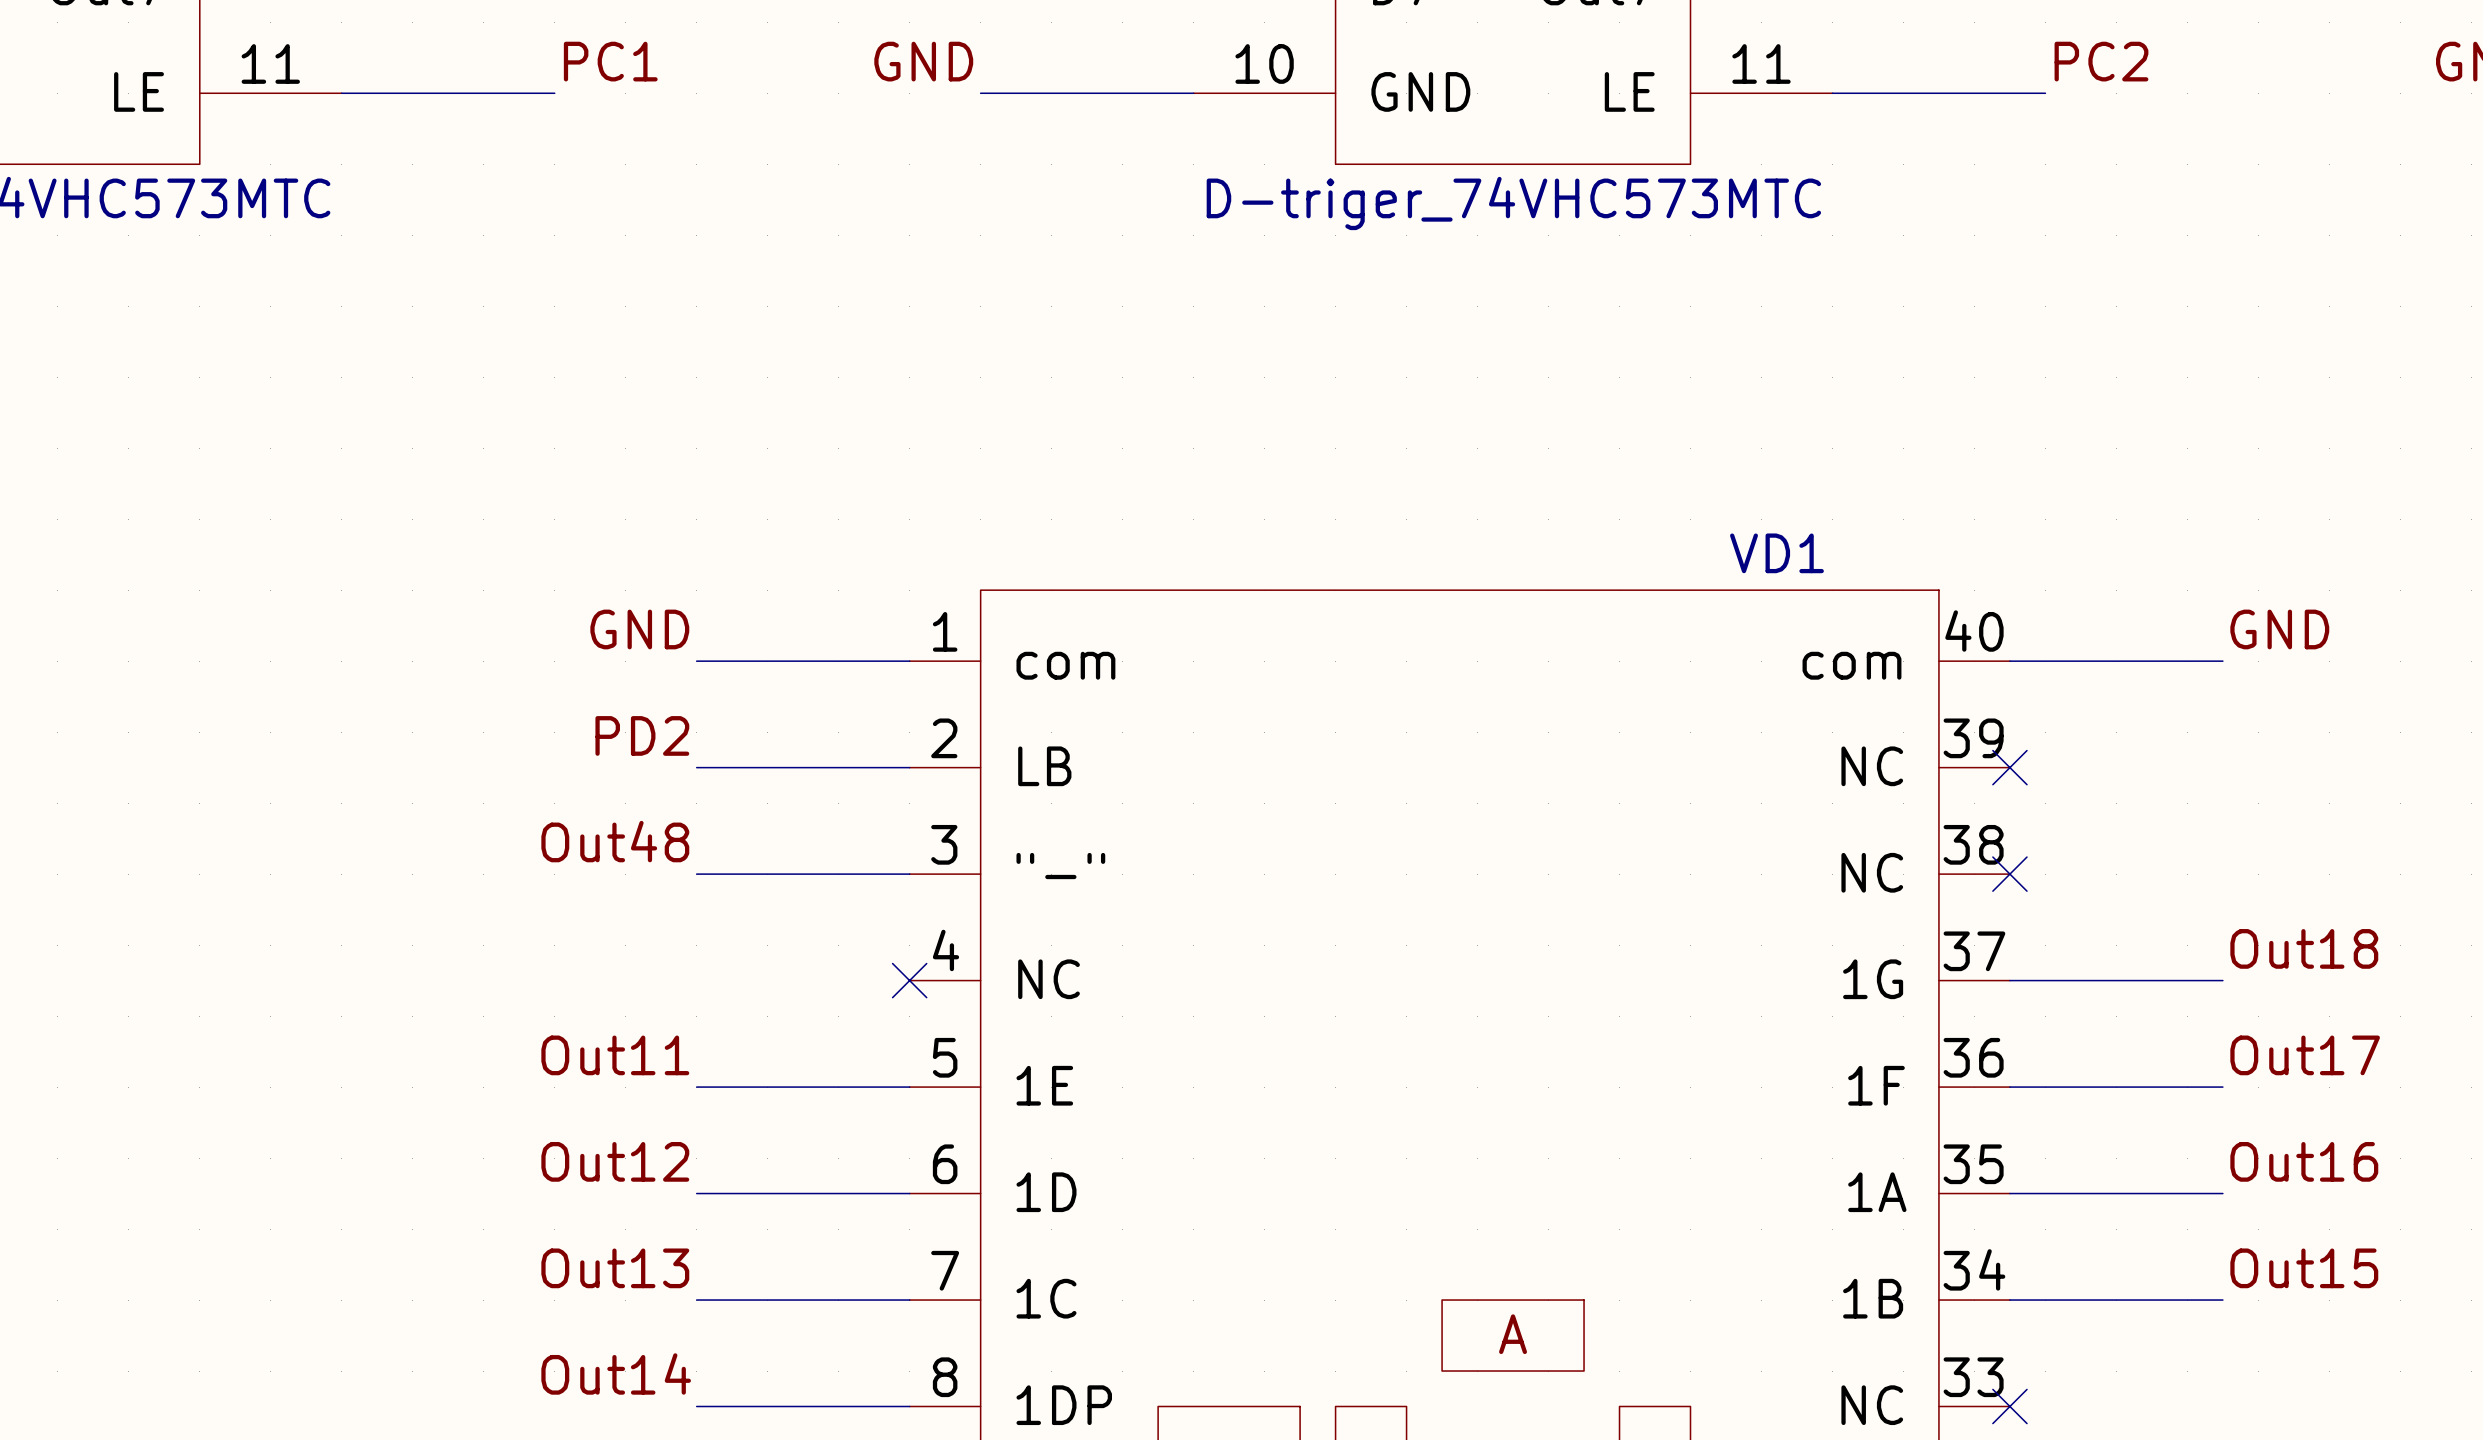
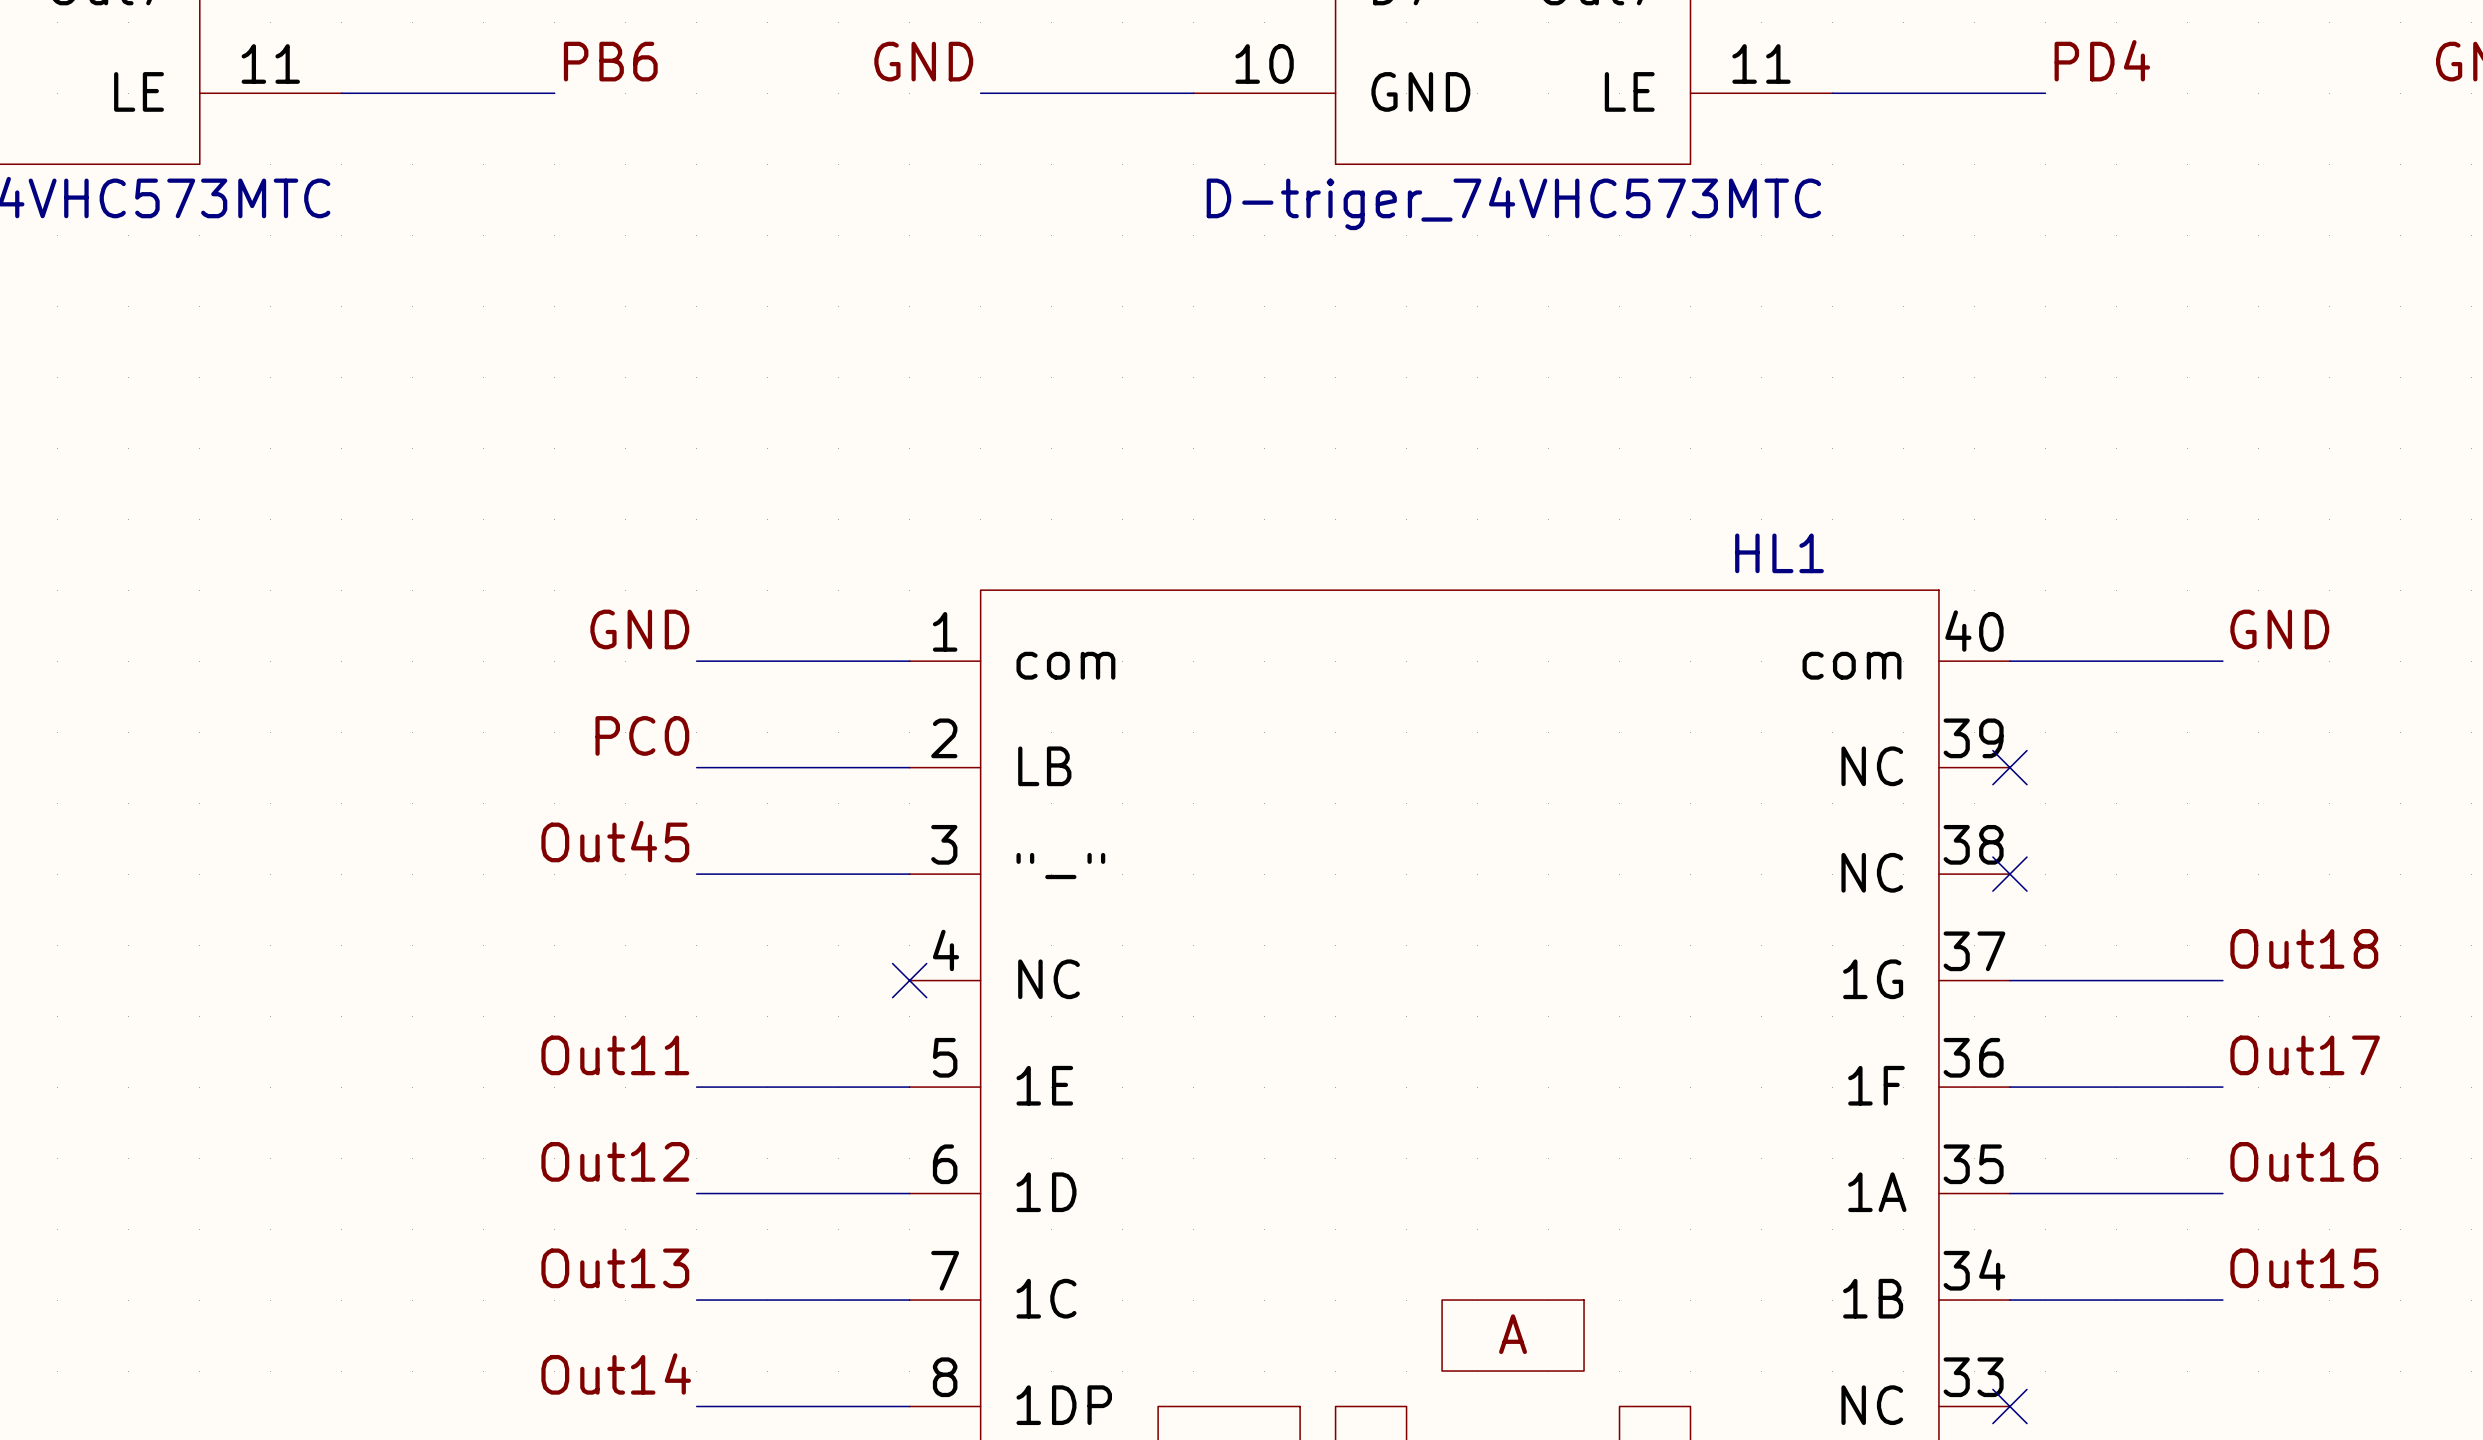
label: PC1 (610, 61) -> PB6 (610, 61)
label: PC2 (2101, 61) -> PD4 (2102, 60)
VD1 name: VD1 (1776, 553) -> HL1 (1779, 553)
label: PD2 (642, 735) -> PC0 (642, 735)
label: Out48 (615, 841) -> Out45 (615, 841)

